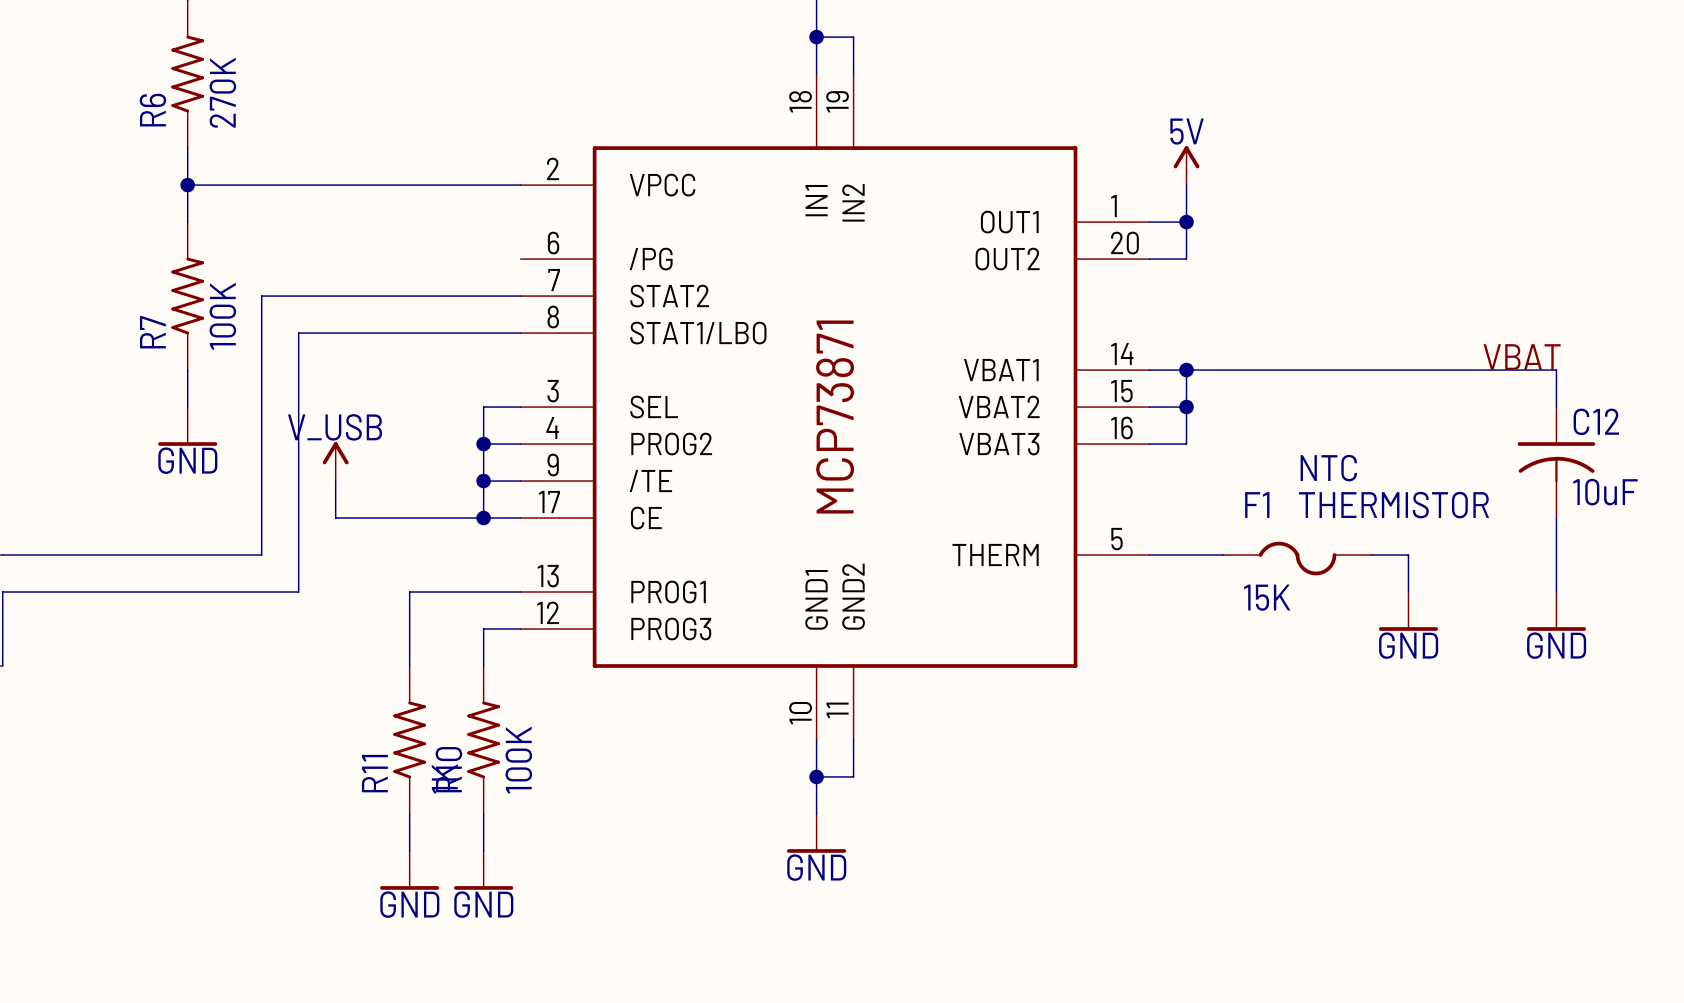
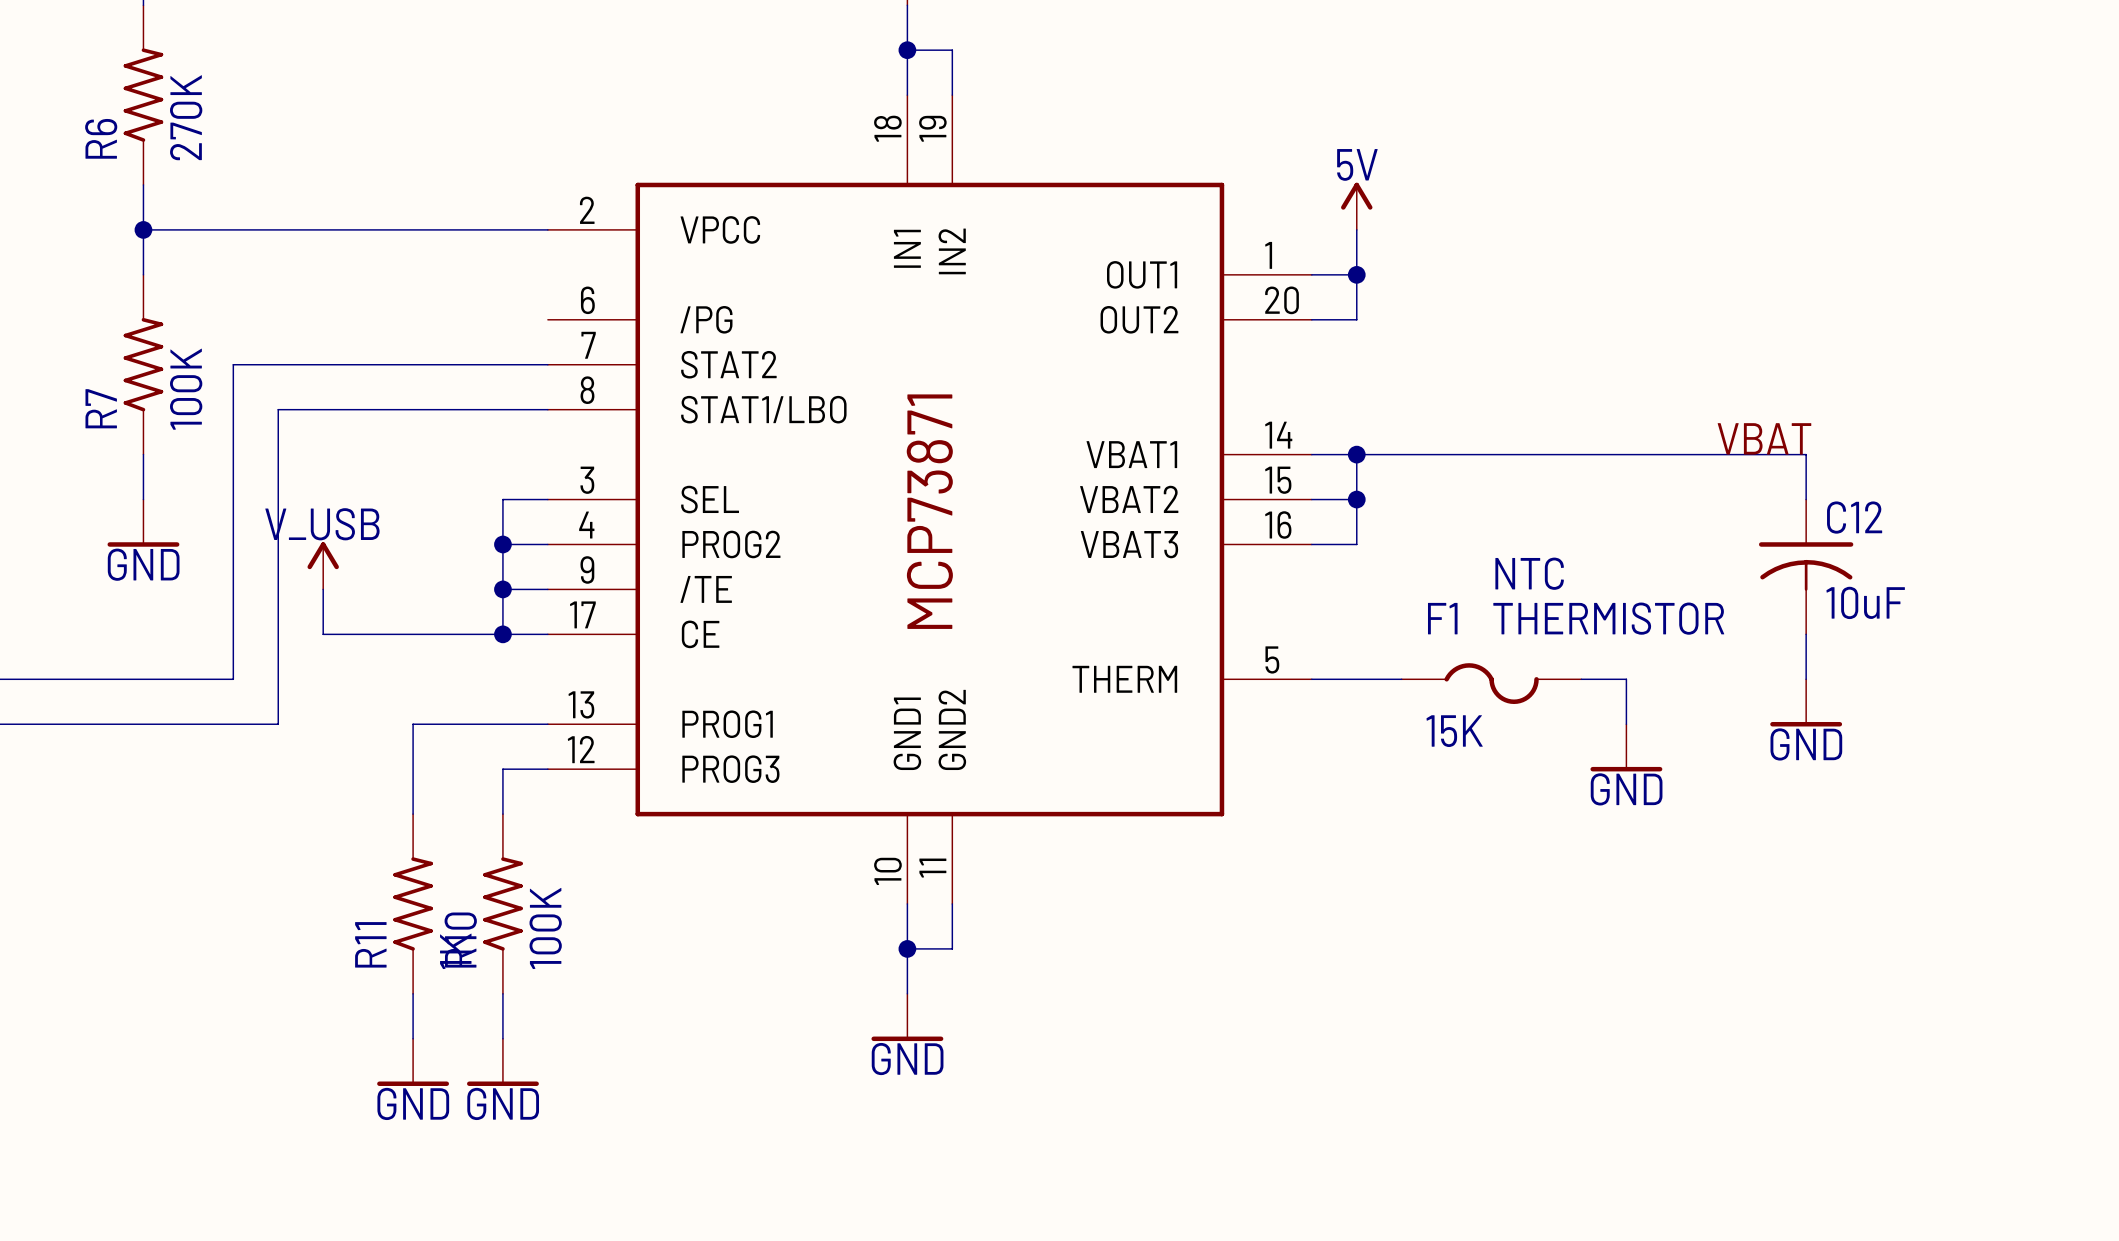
power symbol position: GND (1556, 611) -> GND (1806, 702)

